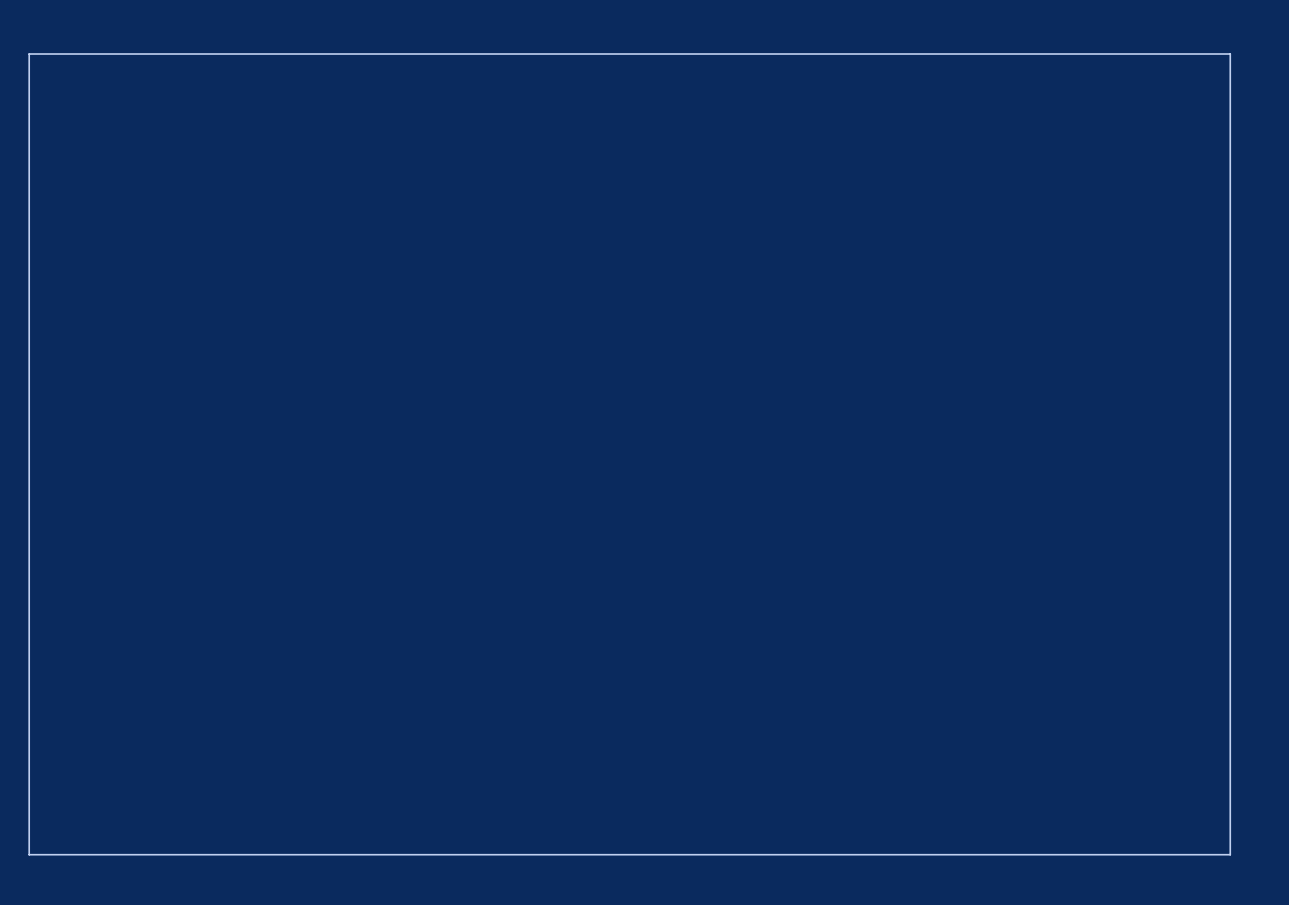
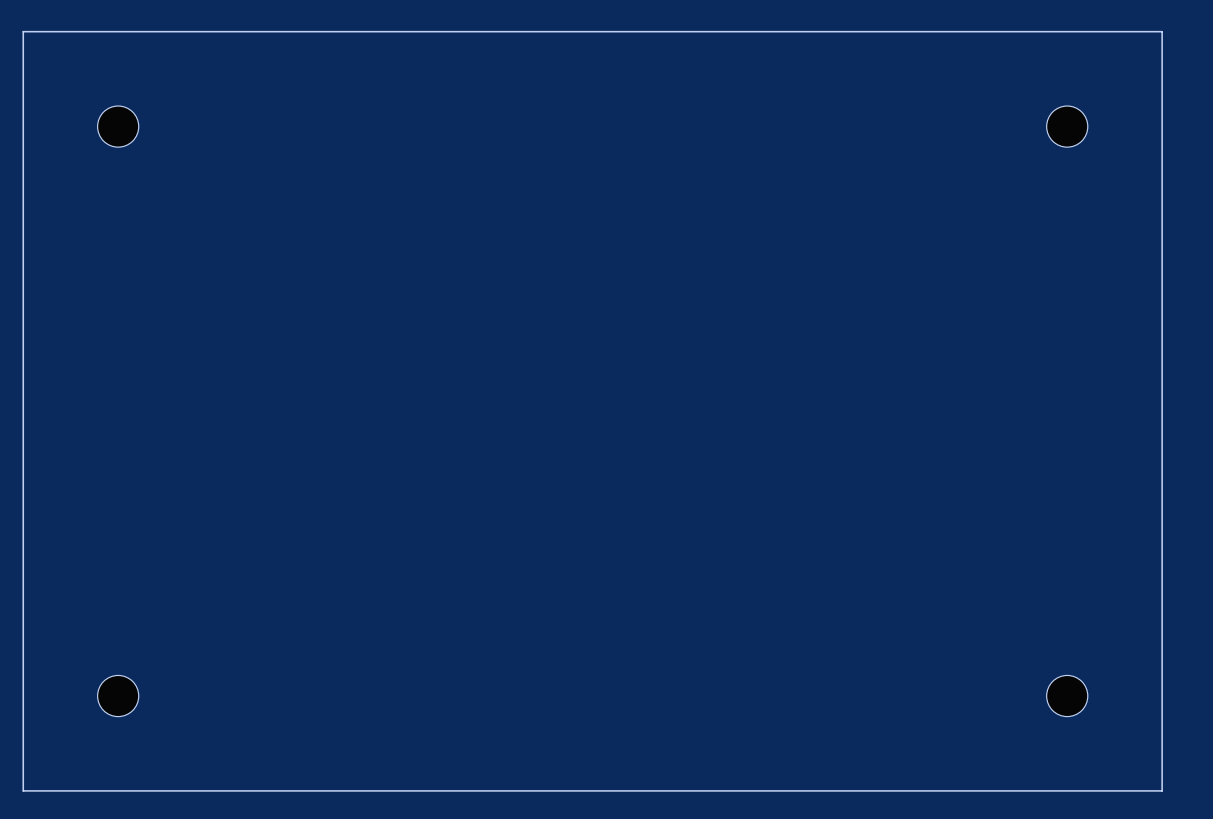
part: none -> (118, 126)
part: none -> (1067, 126)
part: none -> (118, 696)
part: none -> (1067, 696)

